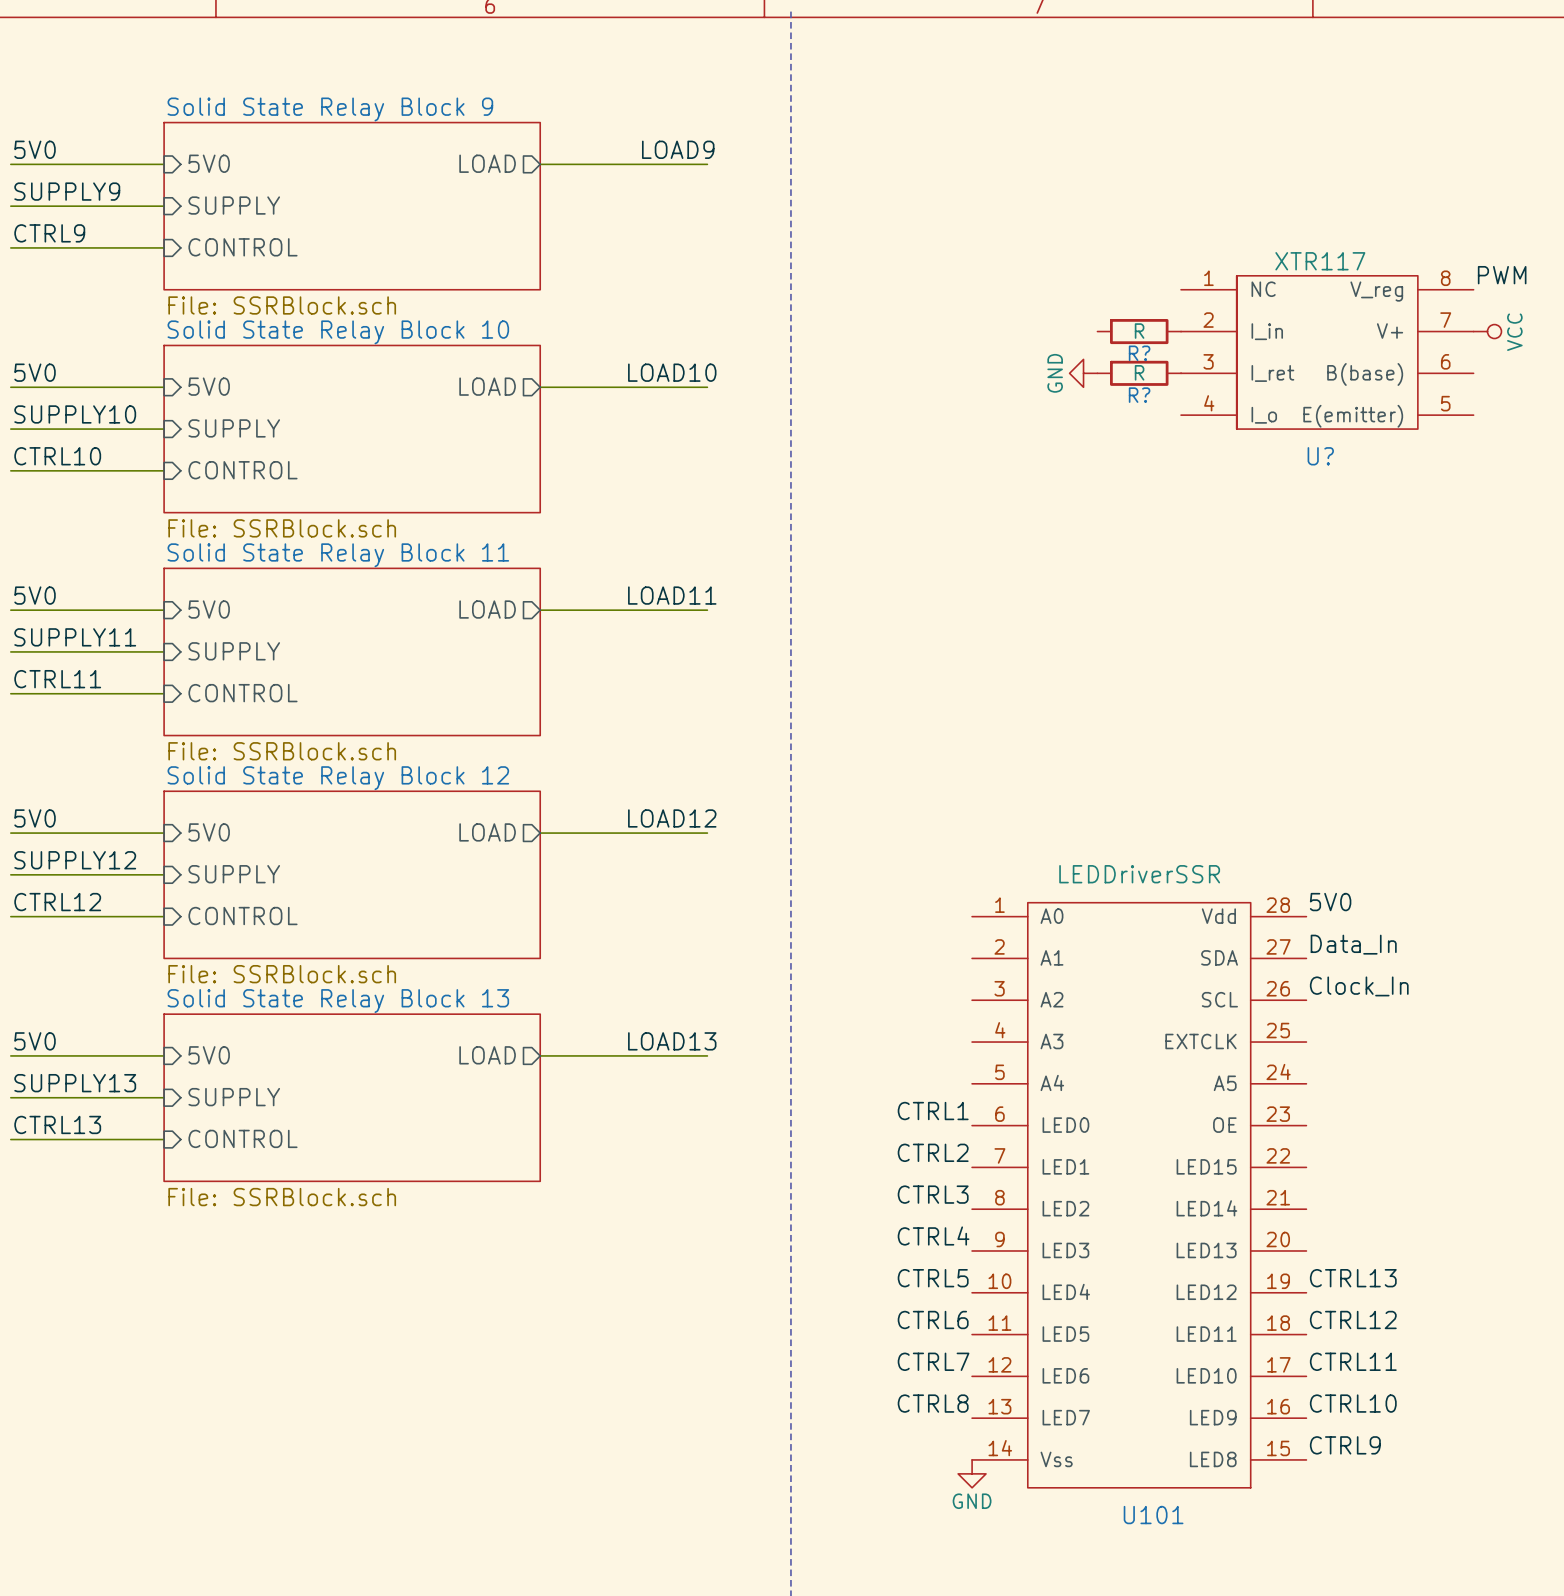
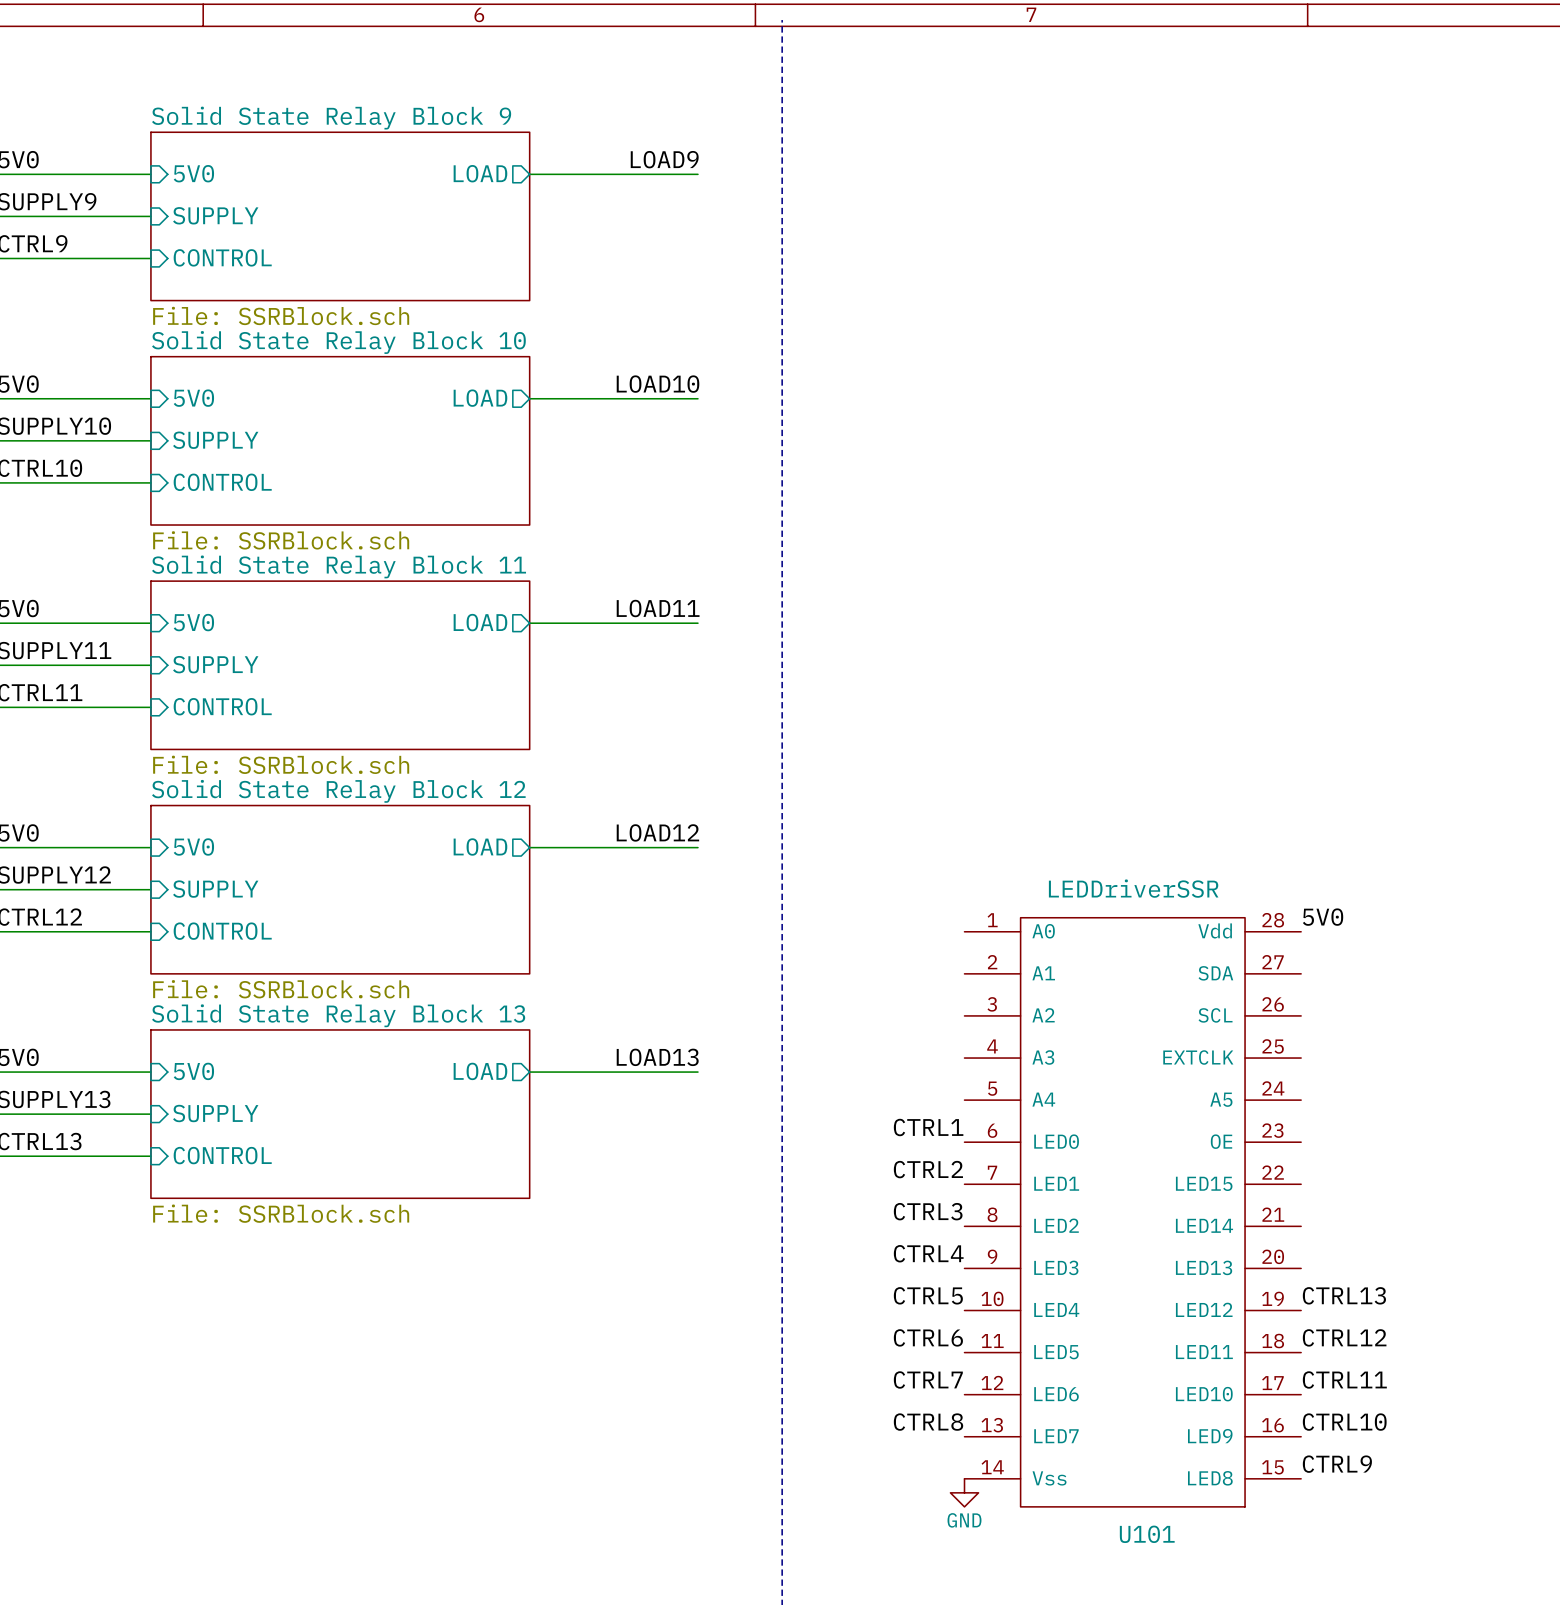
label: PWM (1502, 275) -> none
R?: R (1139, 331) -> none
power symbol: VCC (1487, 331) -> none
U?: XTR117 (1327, 352) -> none
power symbol: GND (1083, 373) -> none
R?: R (1139, 373) -> none
label: Data_In (1353, 944) -> none
label: Clock_In (1359, 986) -> none

